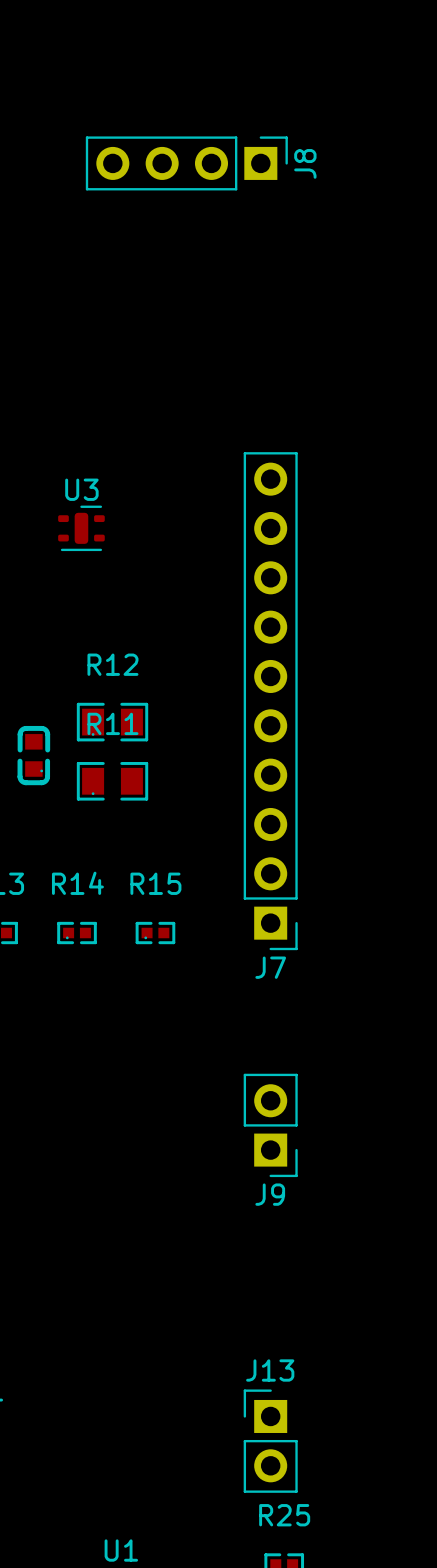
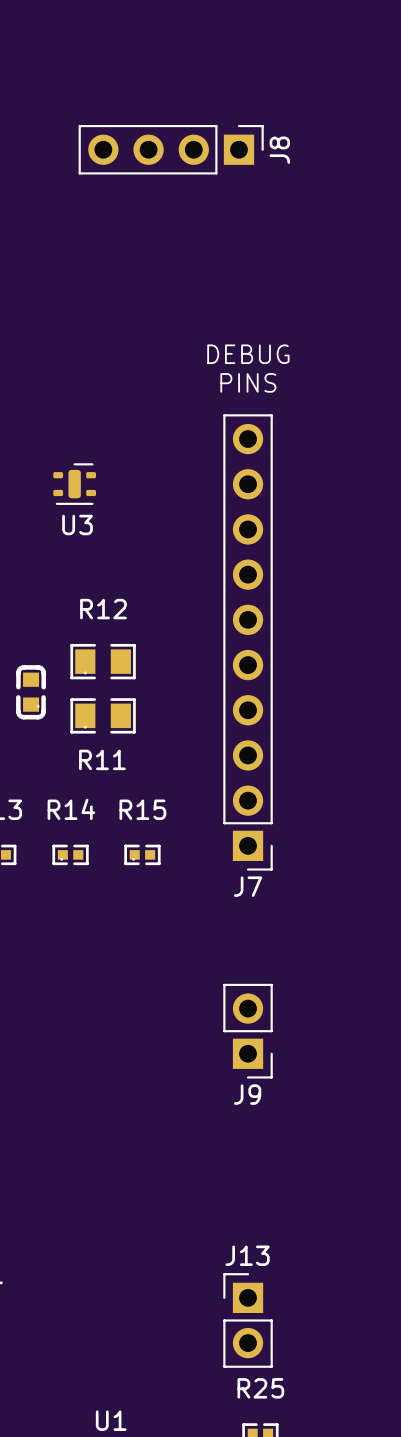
text: none -> DEBUG (248, 354)
text: none -> PINS (248, 382)
U3 name position: U3 (81, 489) -> U3 (77, 525)
R11 name position: R11 (112, 723) -> R11 (102, 759)

